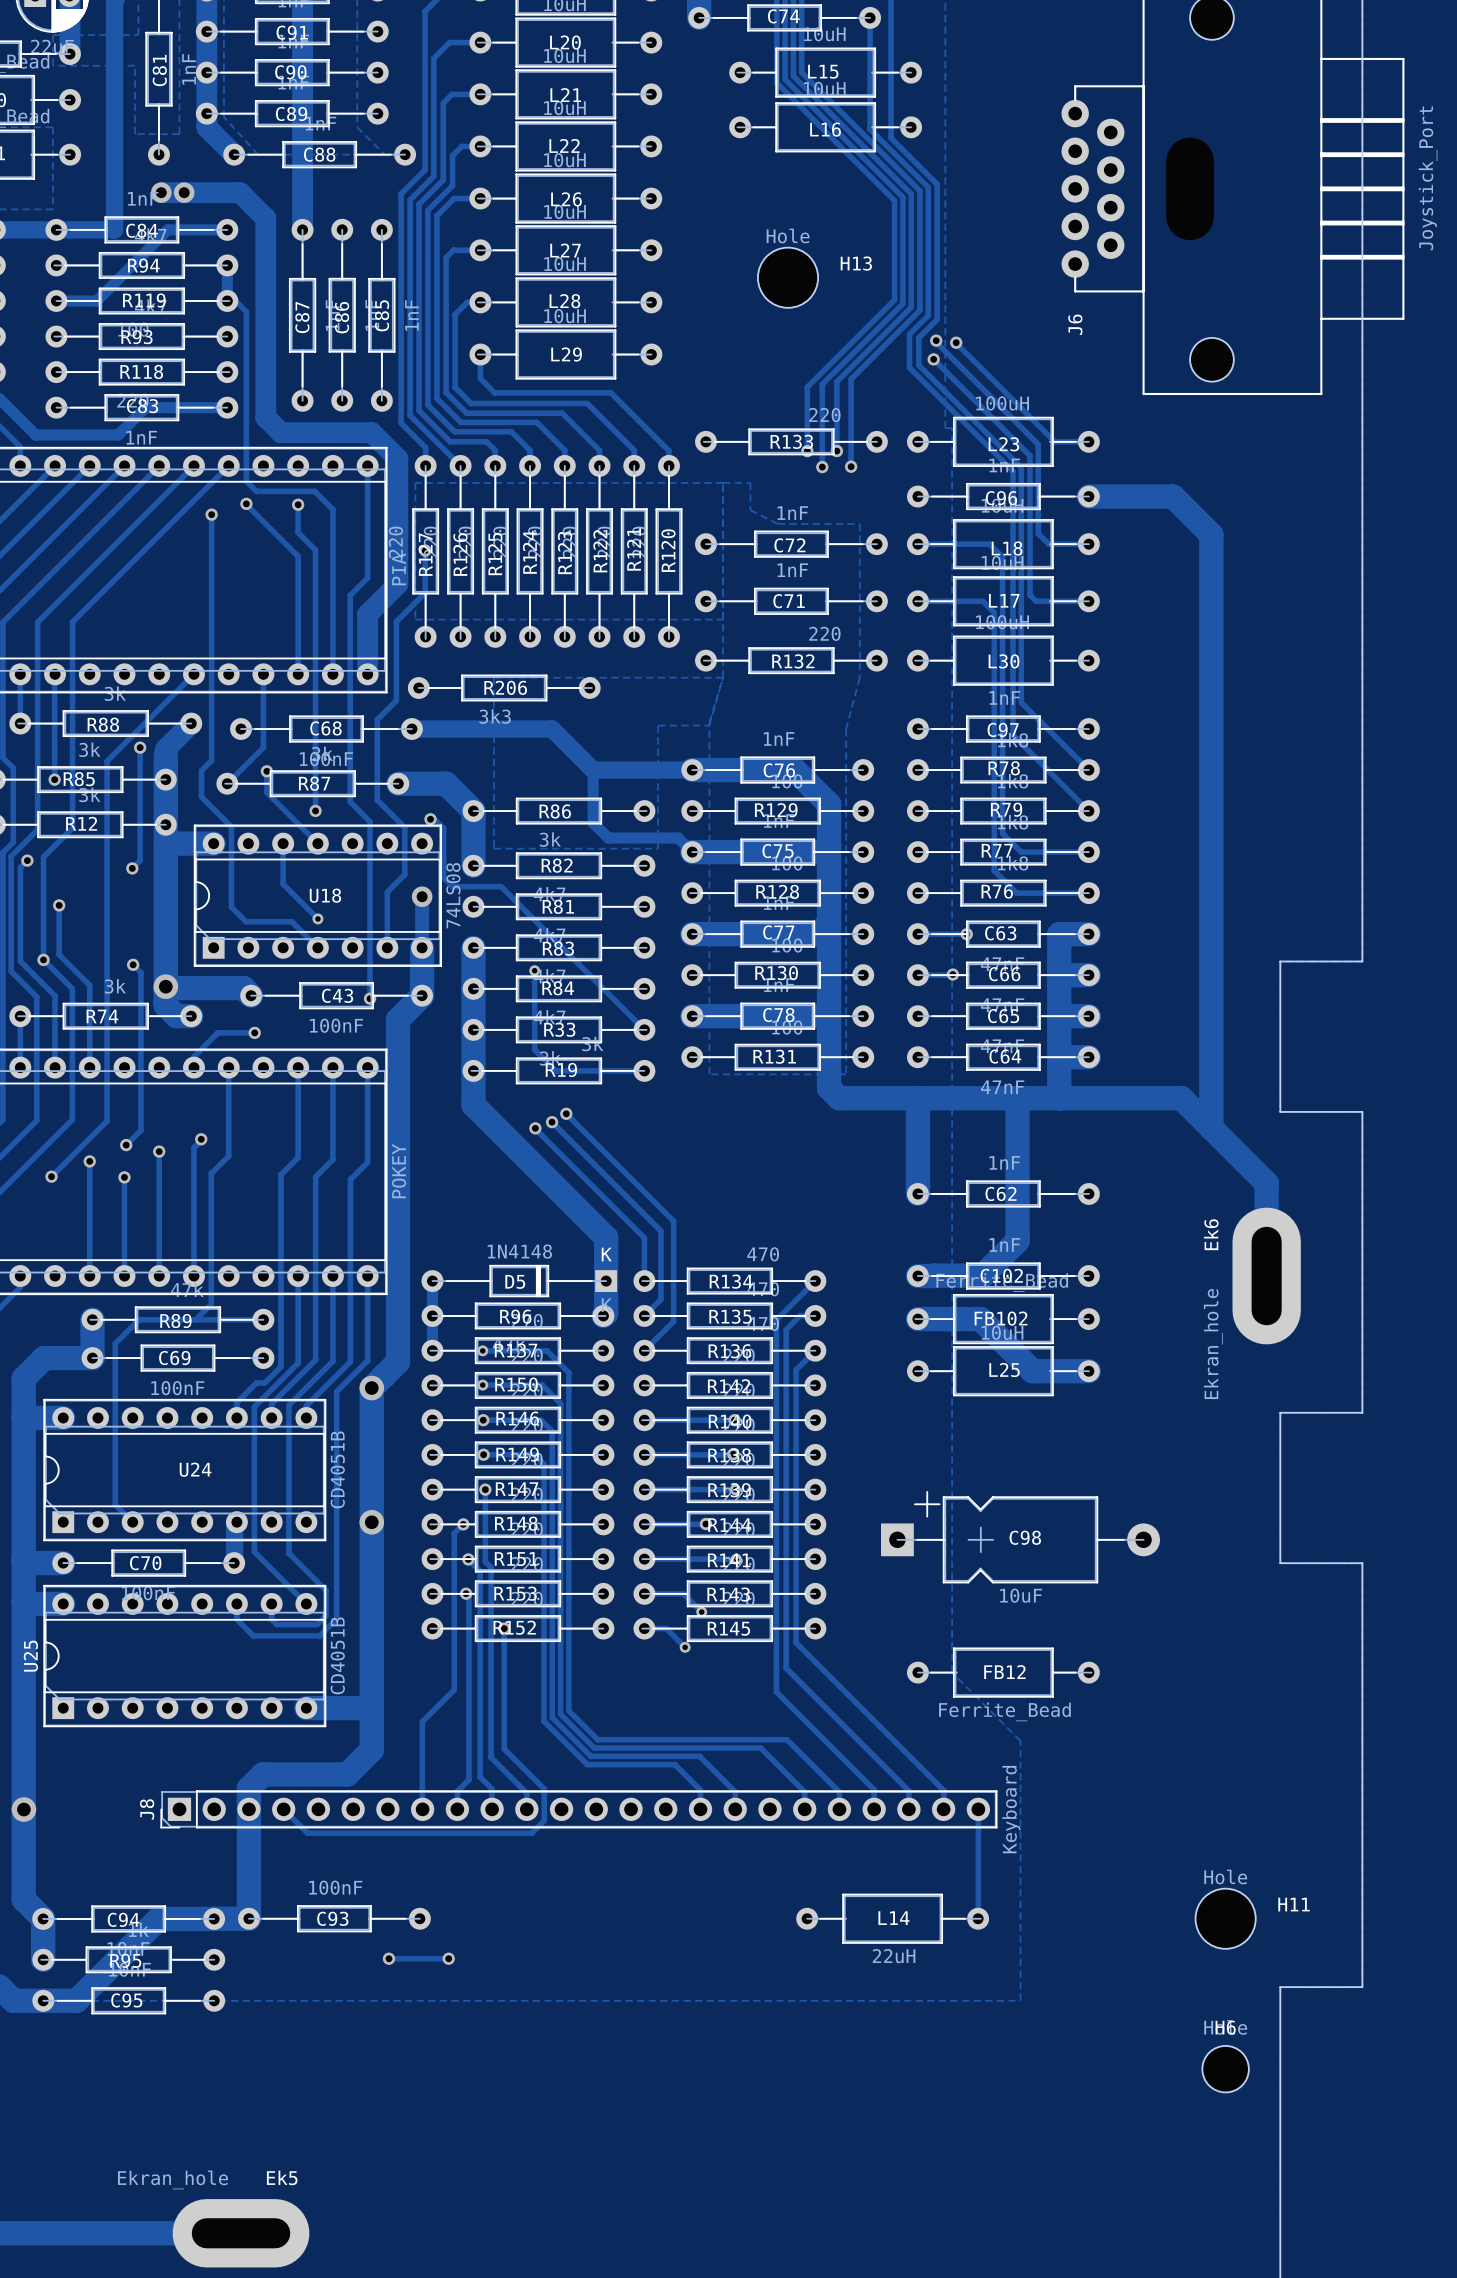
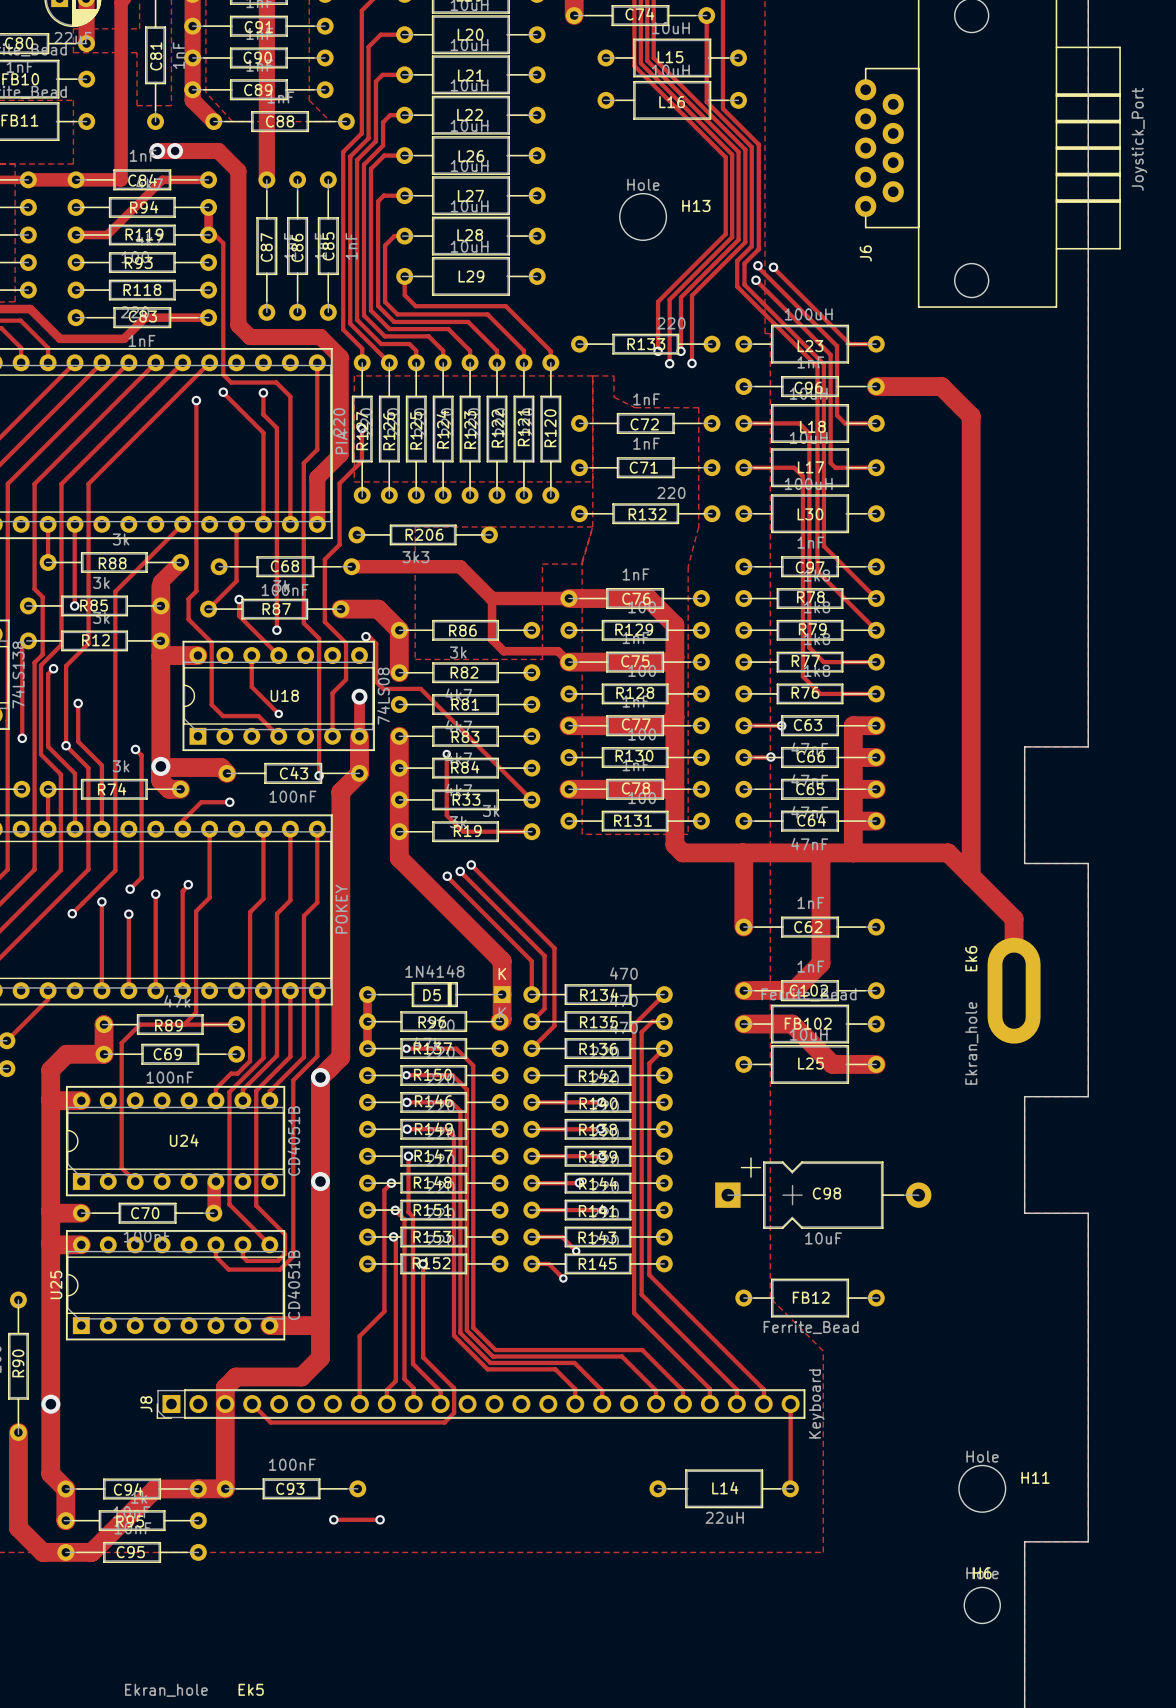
track: (140, 747) (140, 860) (132, 868) -> none
via: (140, 747) -> none
via: (132, 868) -> none

